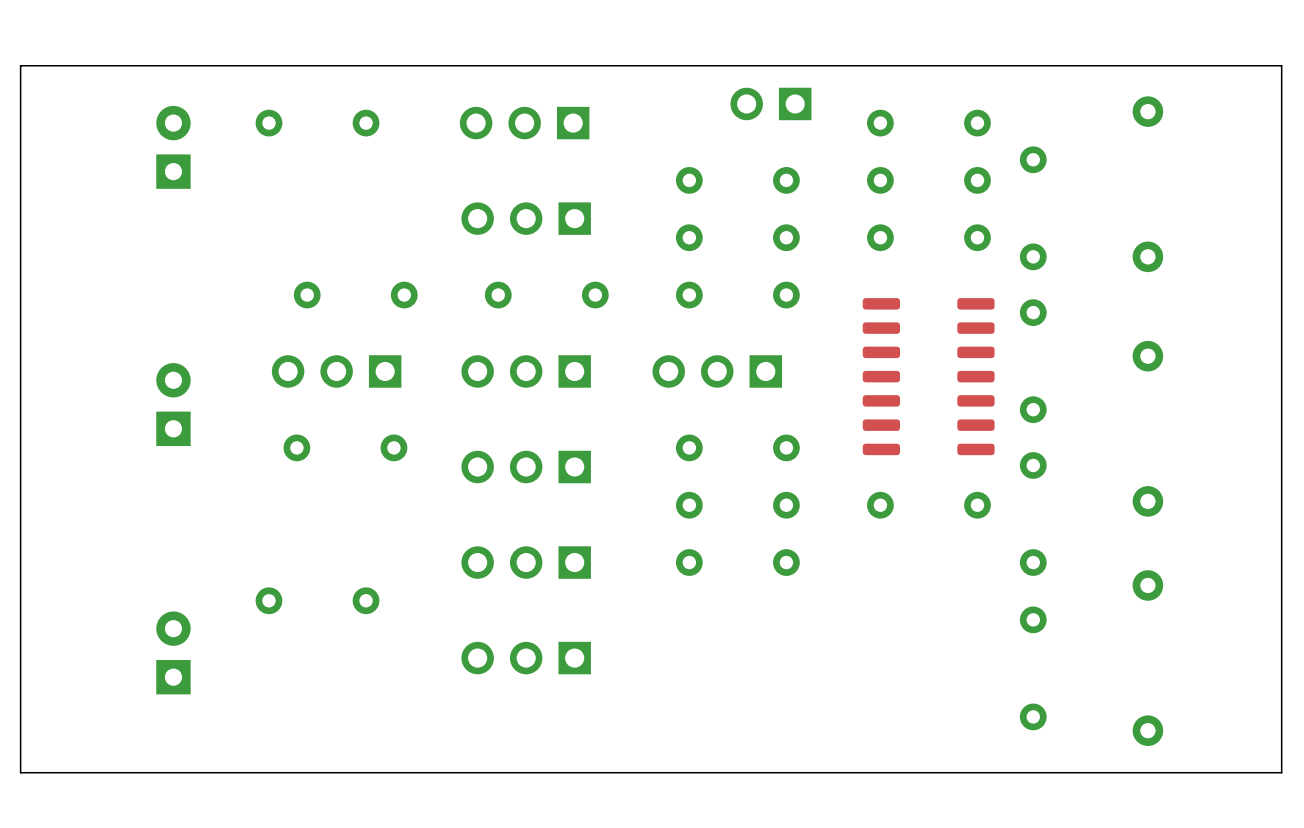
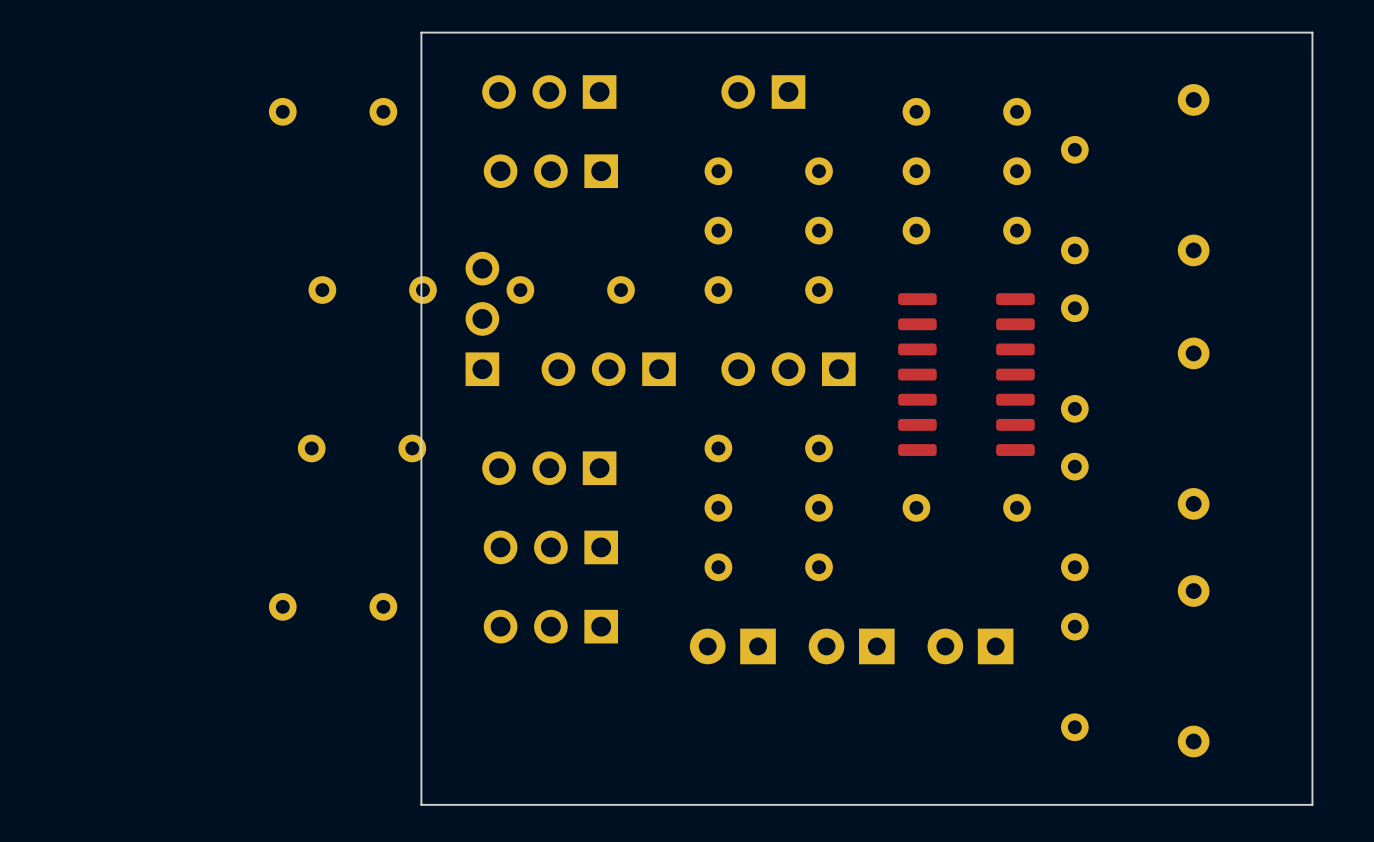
board edge: (1281, 65) (20, 65) (20, 772) (1281, 772) (1281, 65) -> (1312, 32) (1312, 804) (421, 804) (421, 32) (1312, 32)
part position: (770, 103) -> (763, 92)
part position: (524, 123) -> (549, 92)
part: (173, 147) -> none
part: none -> (550, 171)
part: (526, 218) -> none
part: none -> (482, 318)
part: (336, 371) -> none
part: (526, 371) -> none
part: none -> (608, 369)
part position: (717, 371) -> (788, 369)
part: (173, 404) -> none
part position: (526, 562) -> (550, 547)
part: none -> (550, 626)
part: none -> (732, 646)
part: none -> (851, 646)
part: none -> (970, 646)
part: (173, 652) -> none
part: (526, 658) -> none

